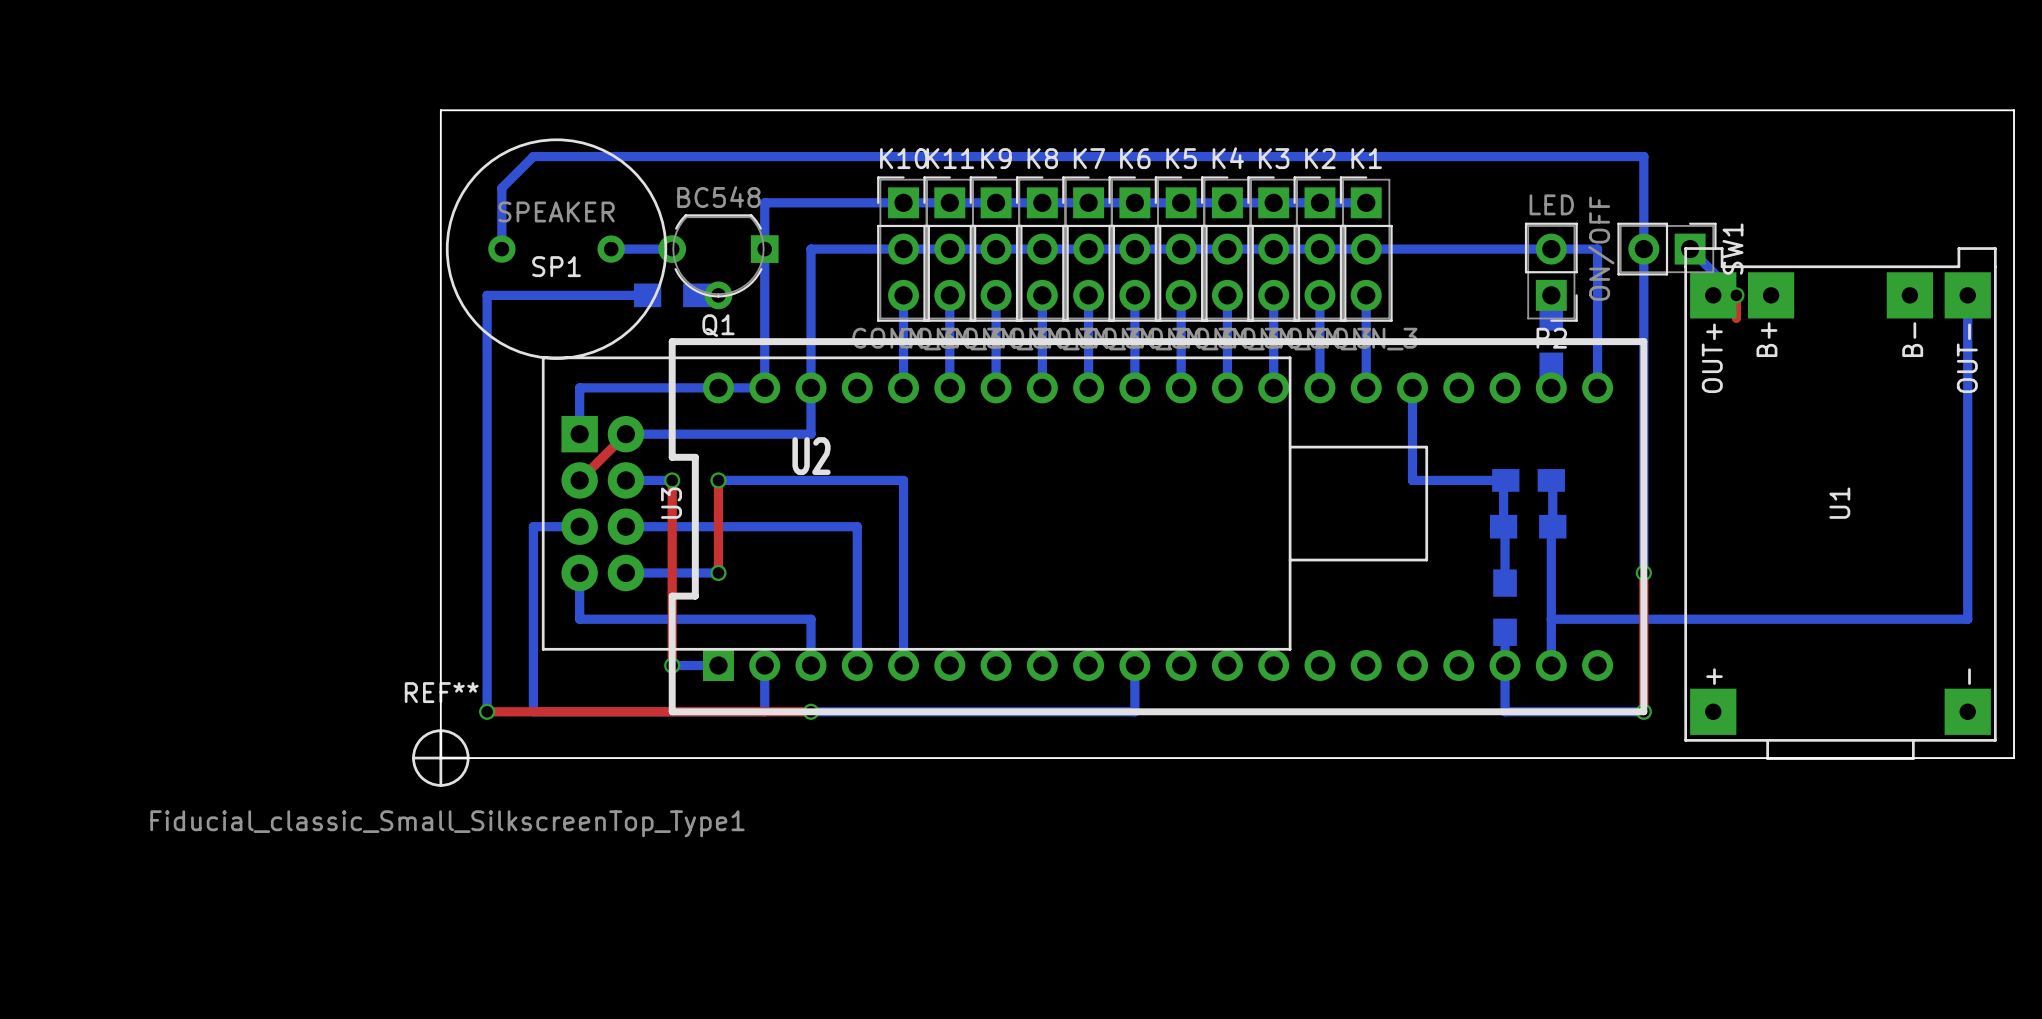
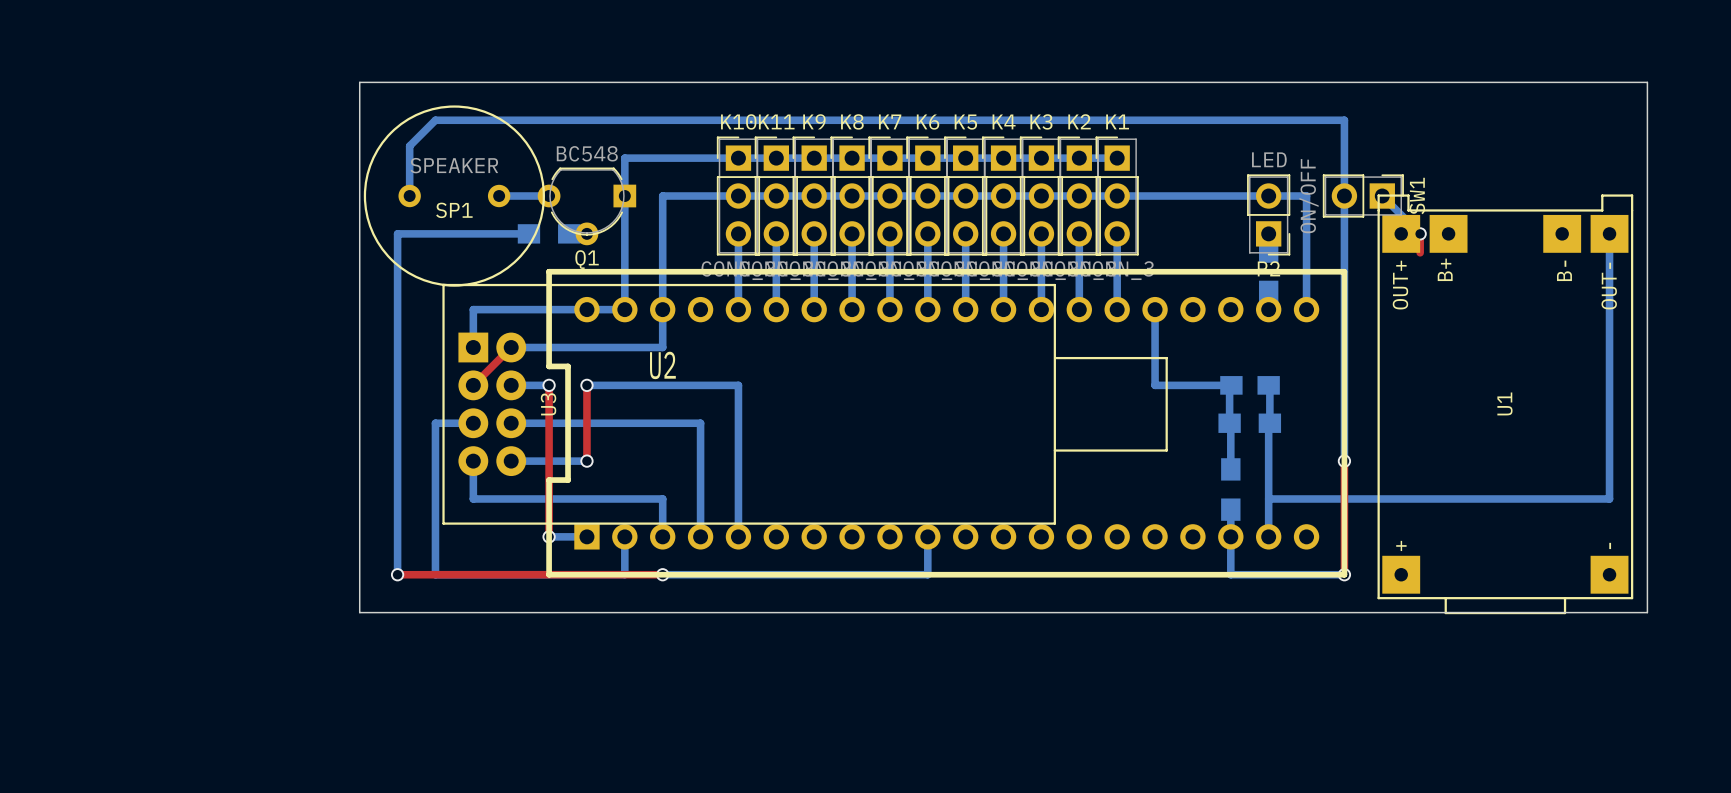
REF**: Fiducial_classic_Small_SilkscreenTop_Type1 (440, 758) -> none

